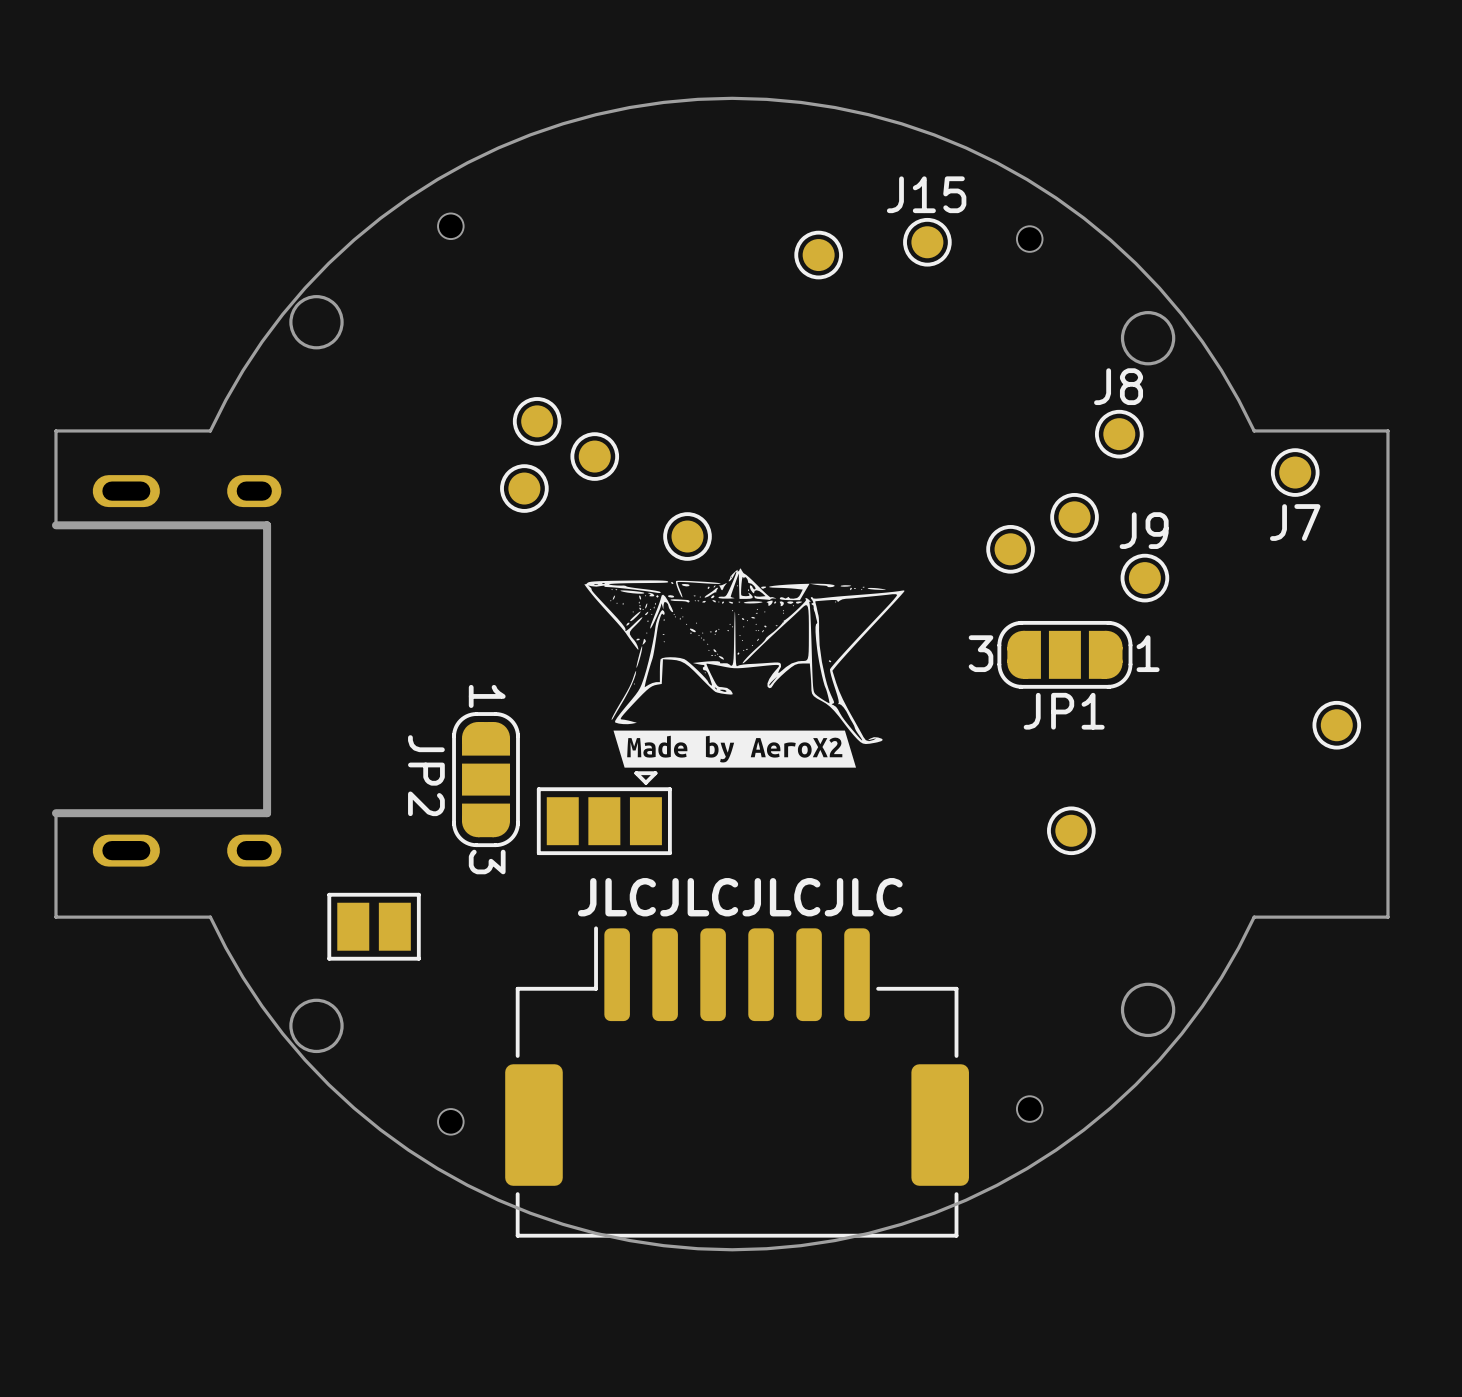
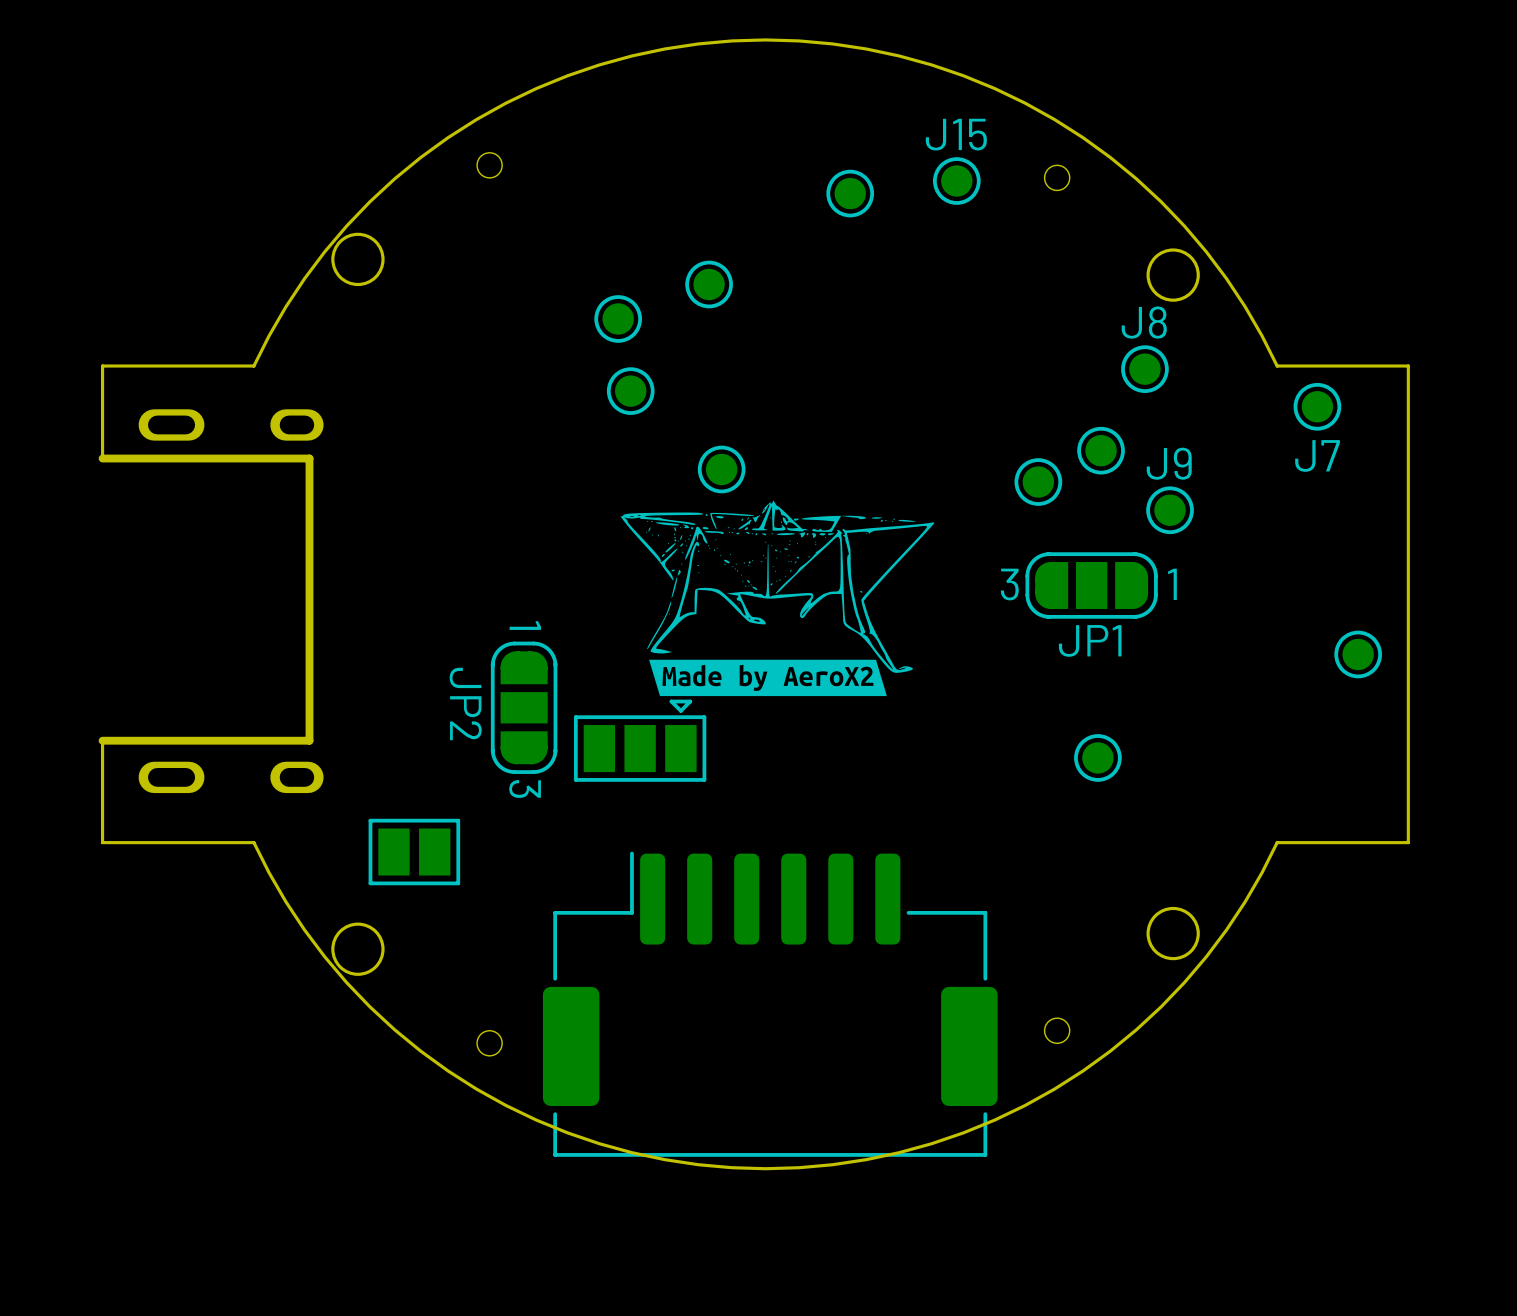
part: none -> (709, 284)
part position: (537, 421) -> (618, 318)
part: (524, 488) -> none
text: JLCJLCJLCJLC (740, 897) -> none

